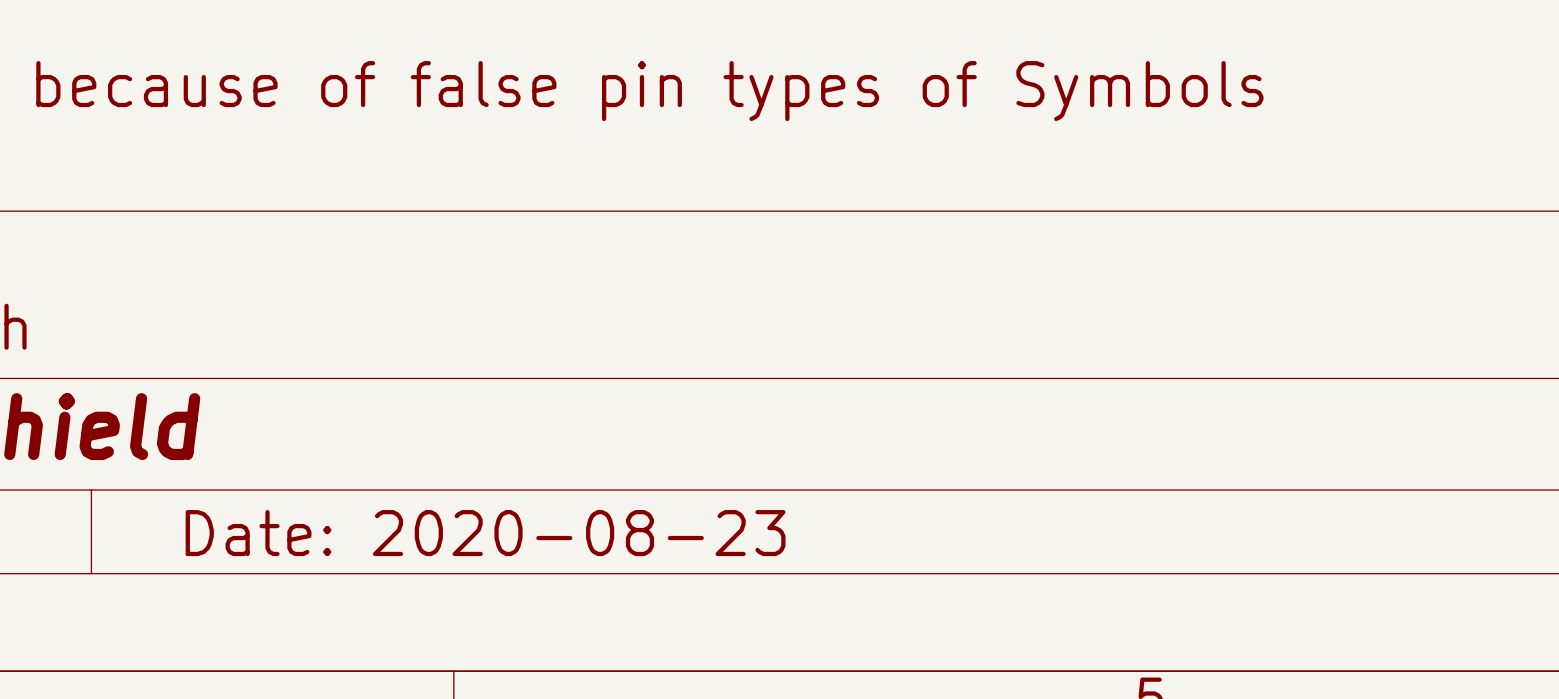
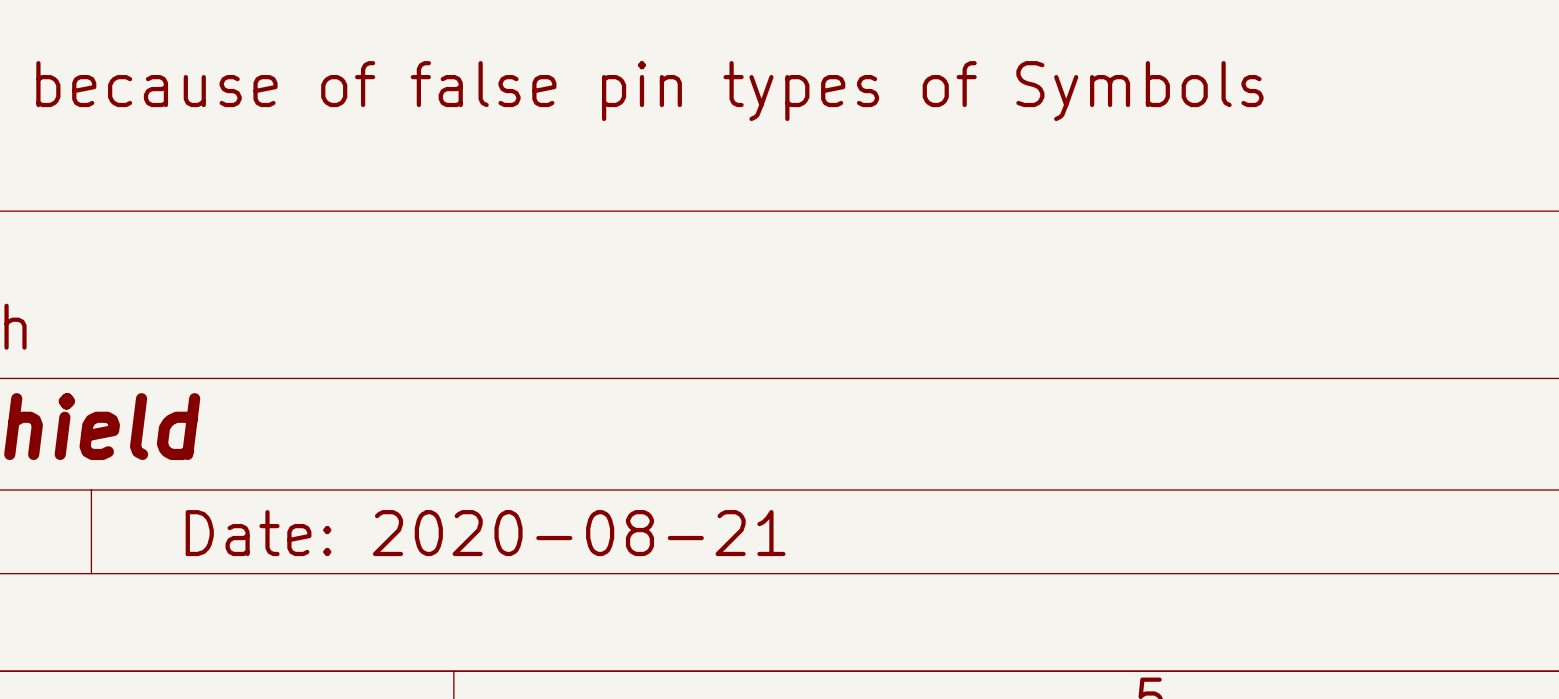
title block: Date: 2020-08-23 (485, 533) -> Date: 2020-08-21 (485, 533)

